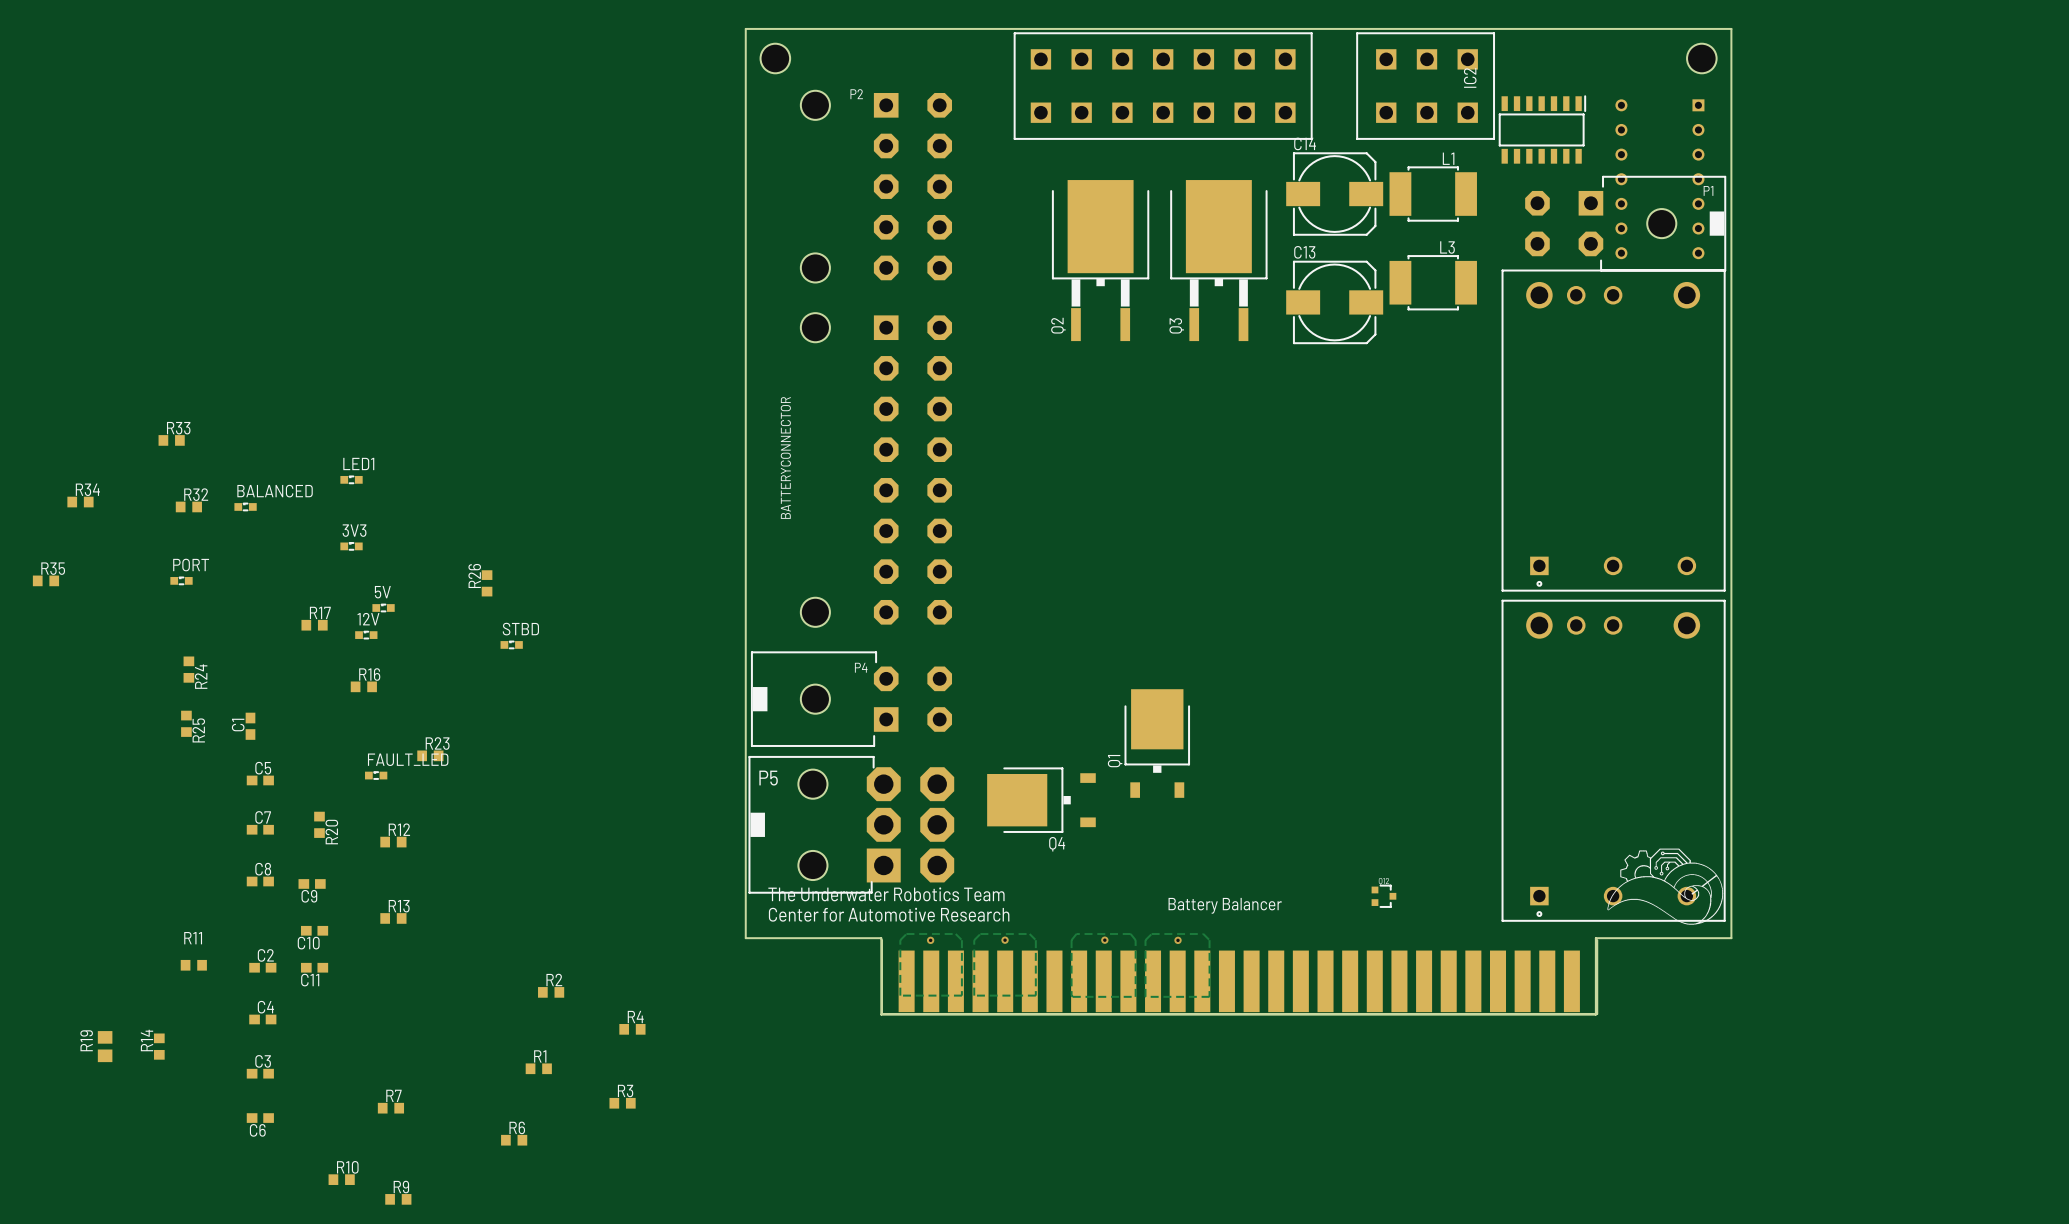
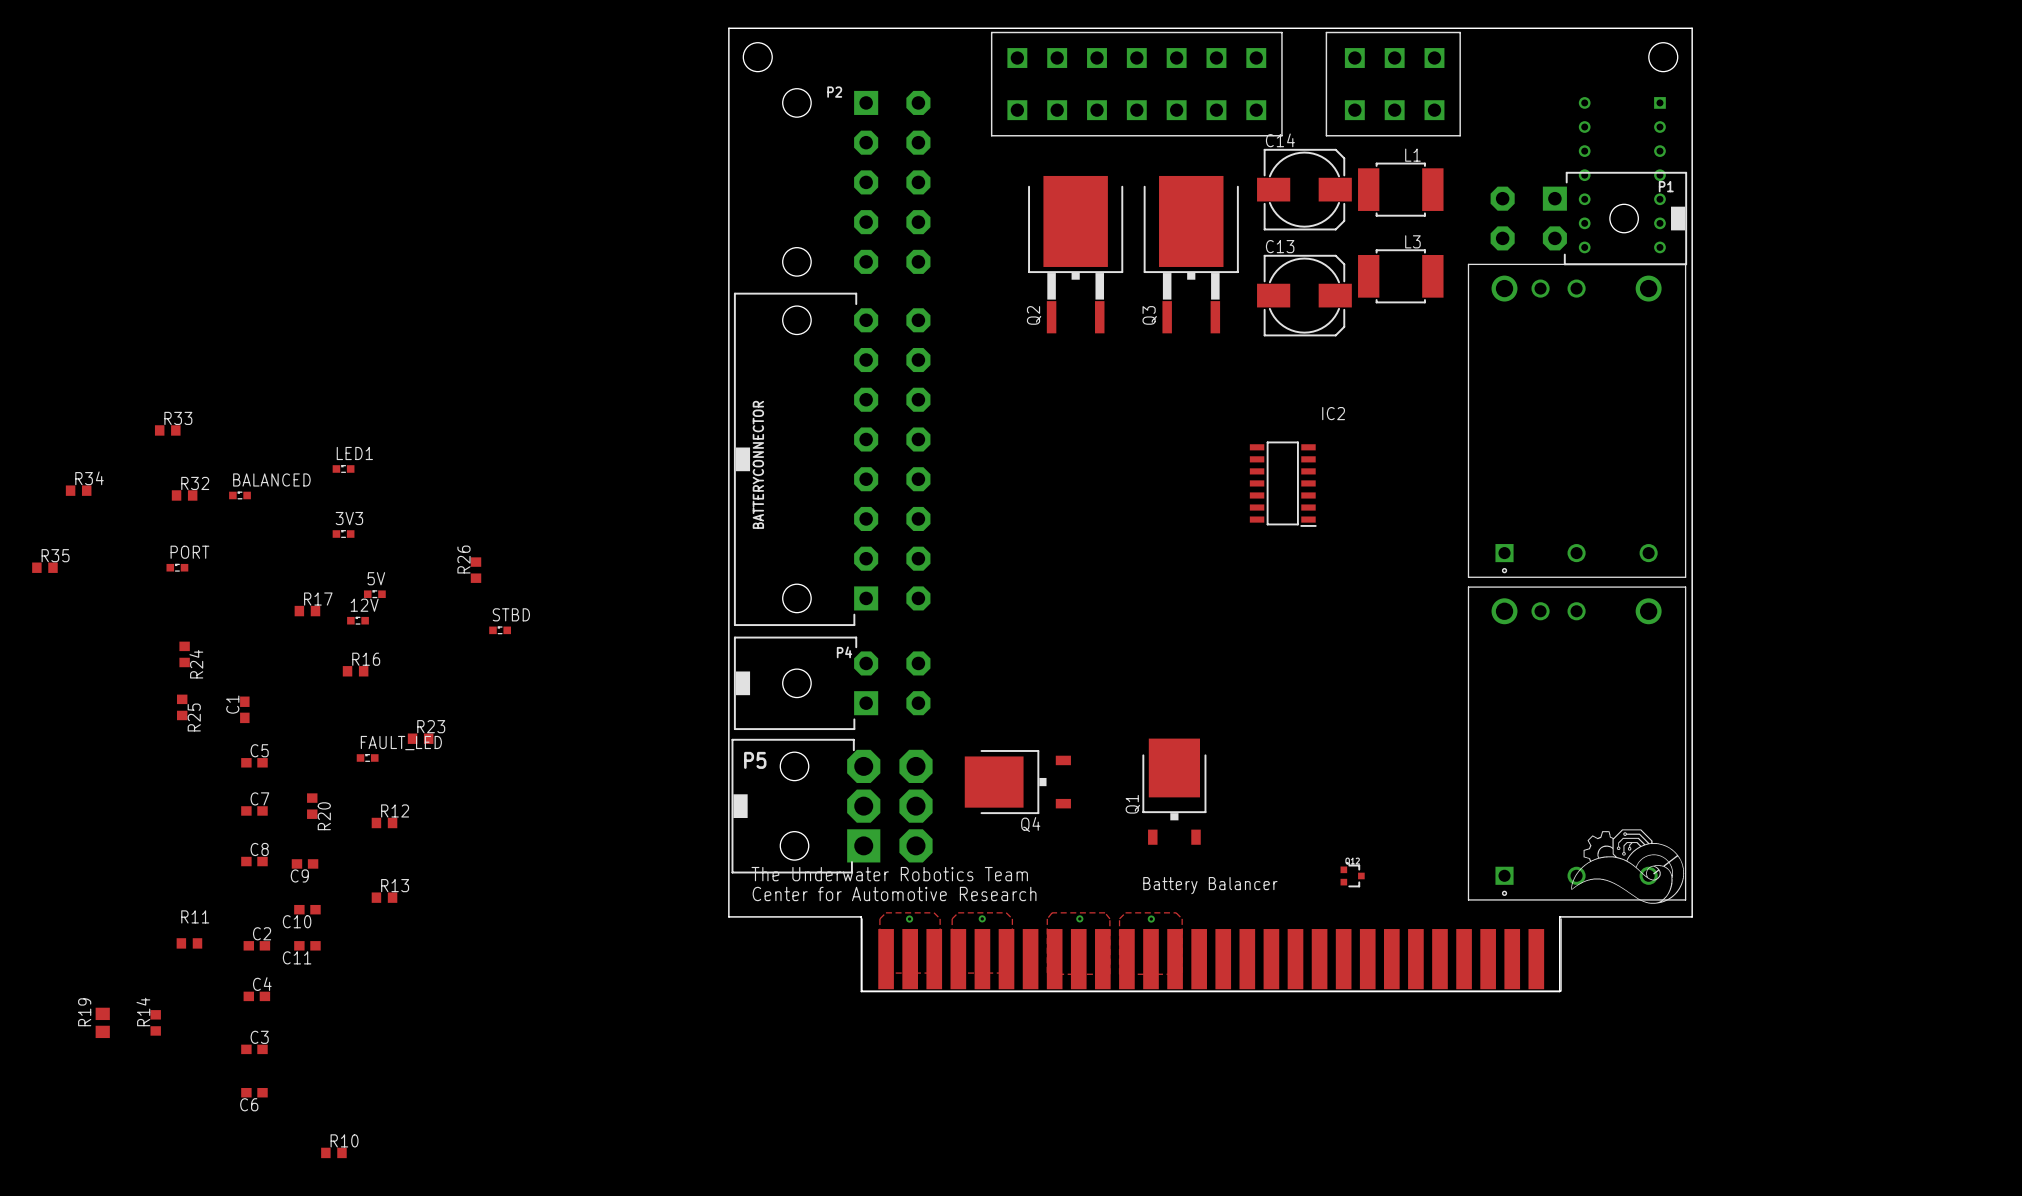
IC2 rotation: 0° (1542, 129) -> 90° clockwise (1283, 484)
IC2 position: (1542, 129) -> (1283, 484)
BATTERYCONNECTOR side: bottom (876, 470) -> top (832, 459)
Q1 position: (1157, 743) -> (1174, 791)
R2: (551, 992) -> none
R4: (632, 1029) -> none
R1: (538, 1068) -> none
R3: (622, 1103) -> none
R7: (390, 1108) -> none
R6: (514, 1140) -> none
R9: (398, 1199) -> none

